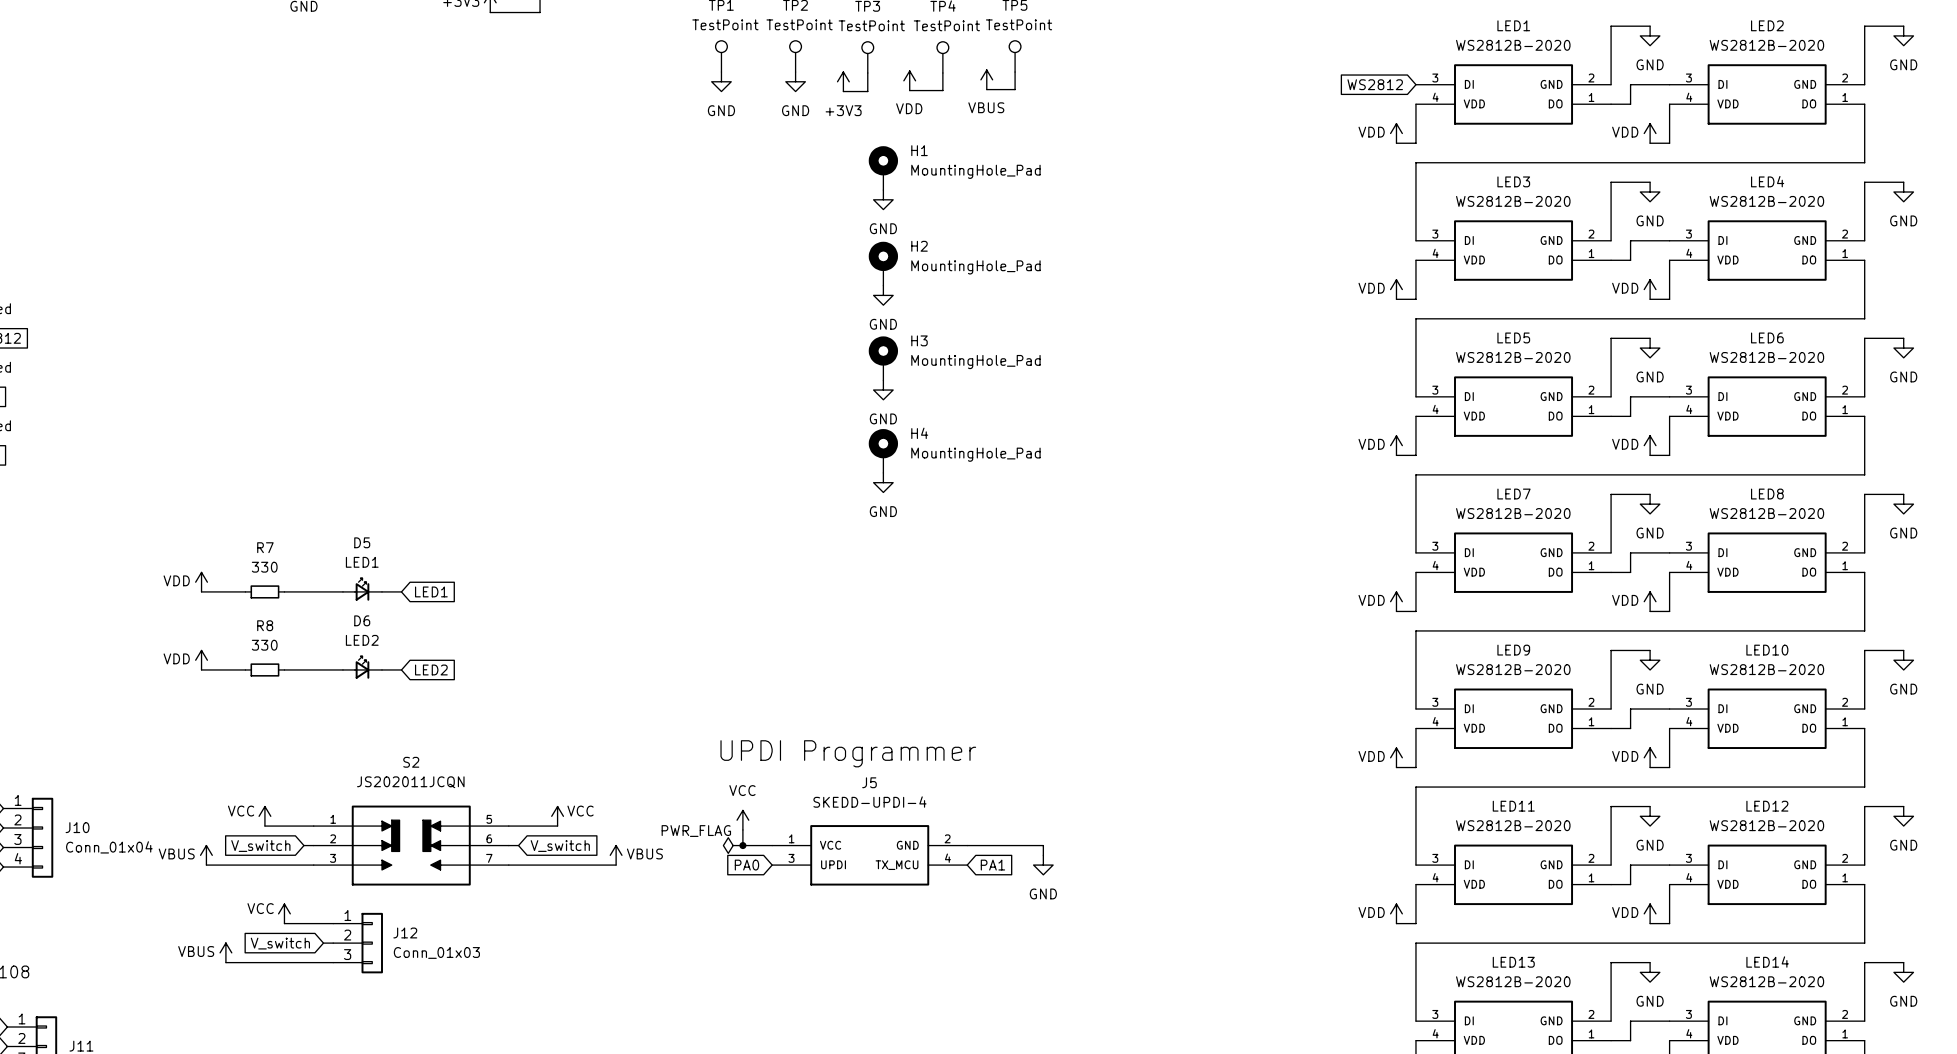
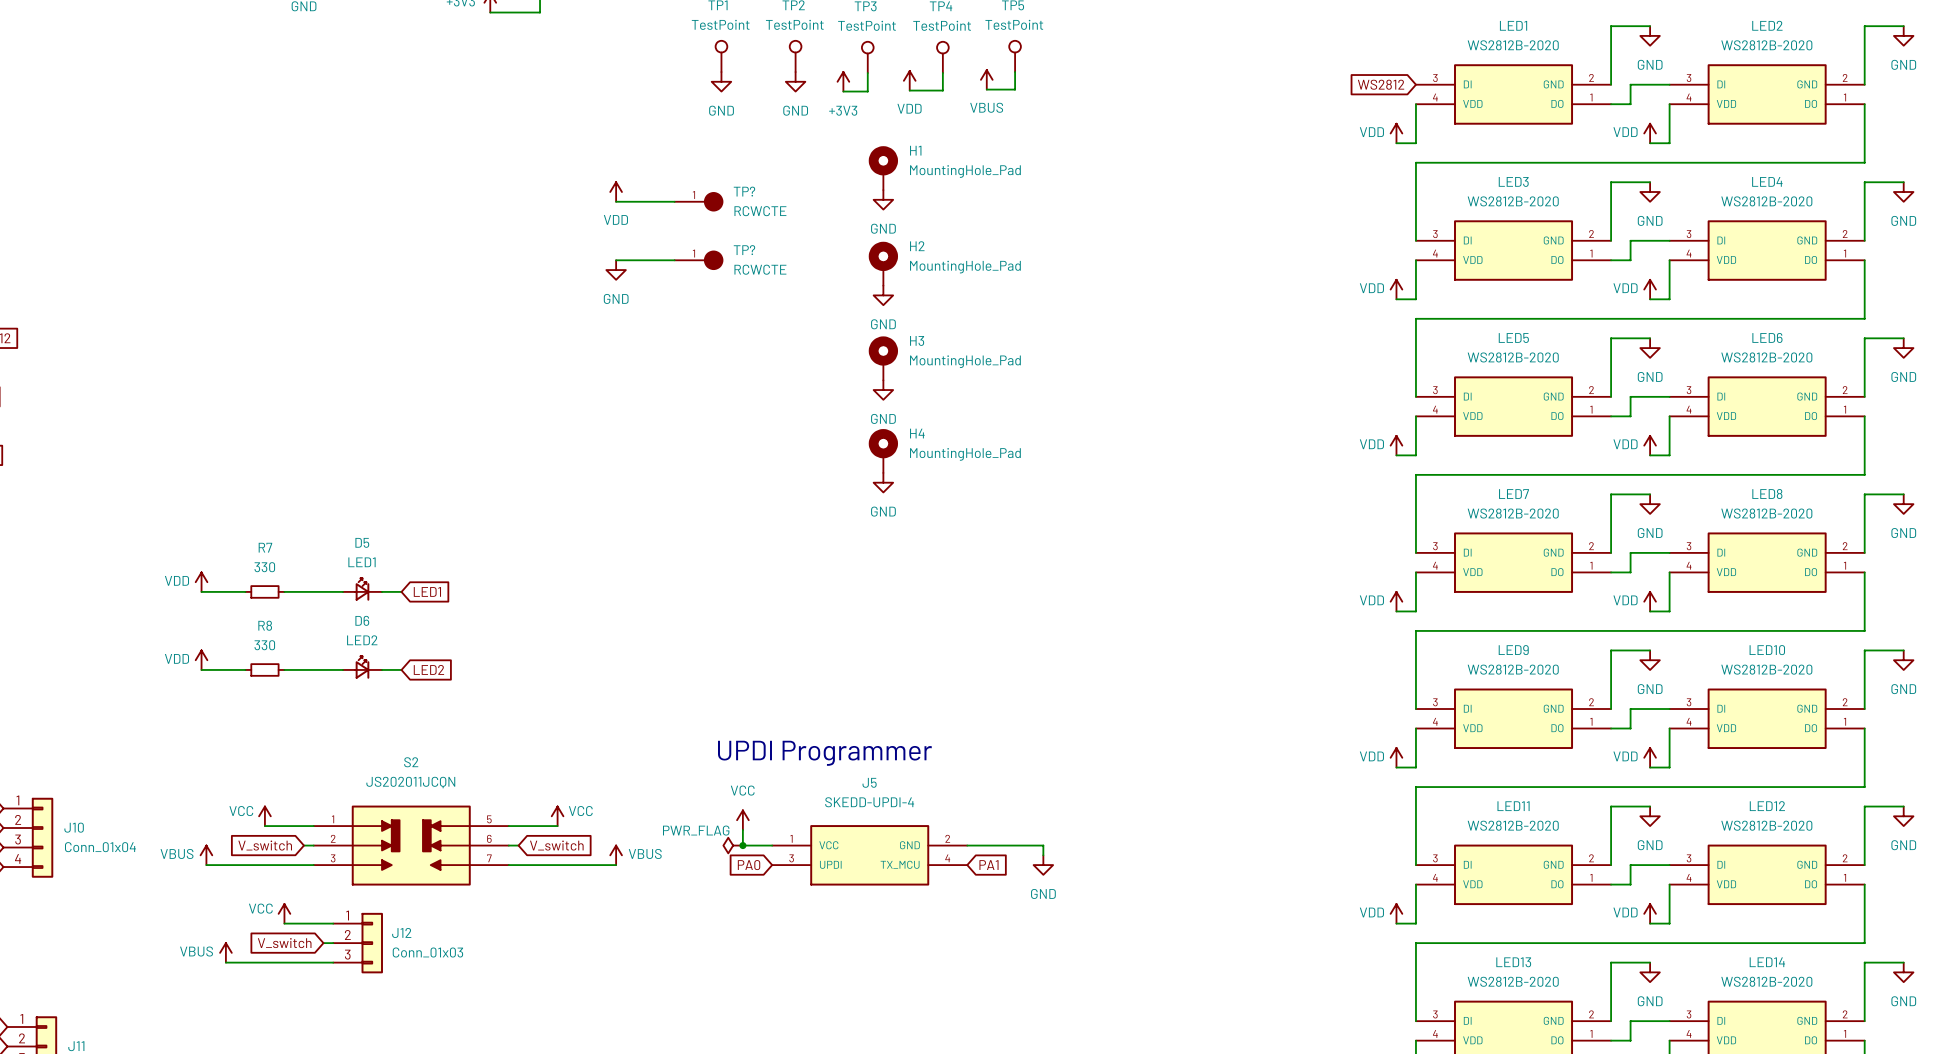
power symbol: none -> VDD (616, 192)
wire: none -> (616, 201) (674, 201)
TP?: none -> RCWCTE (699, 201)
wire: none -> (616, 260) (674, 260)
TP?: none -> RCWCTE (699, 260)
power symbol: none -> GND (616, 270)

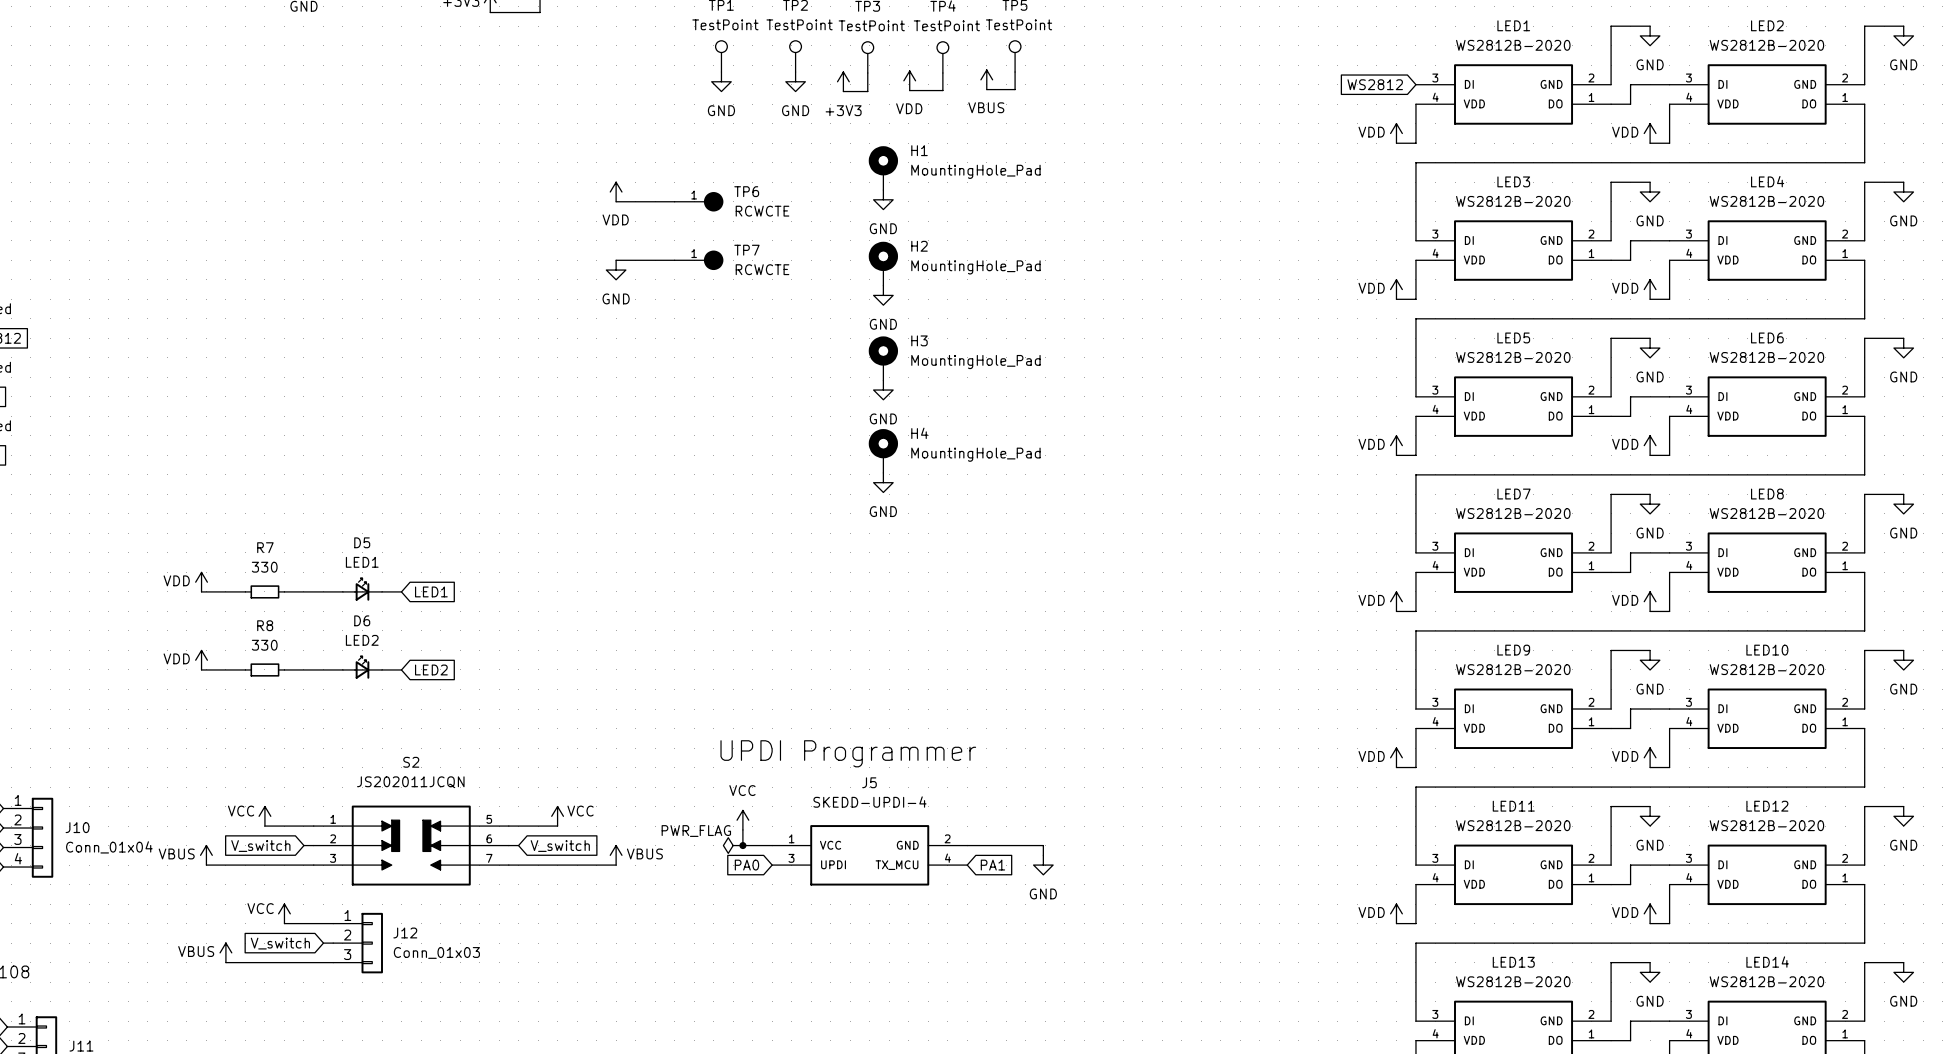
TP? name: TP? (744, 191) -> TP6 (746, 191)
TP? name: TP? (744, 250) -> TP7 (746, 250)

